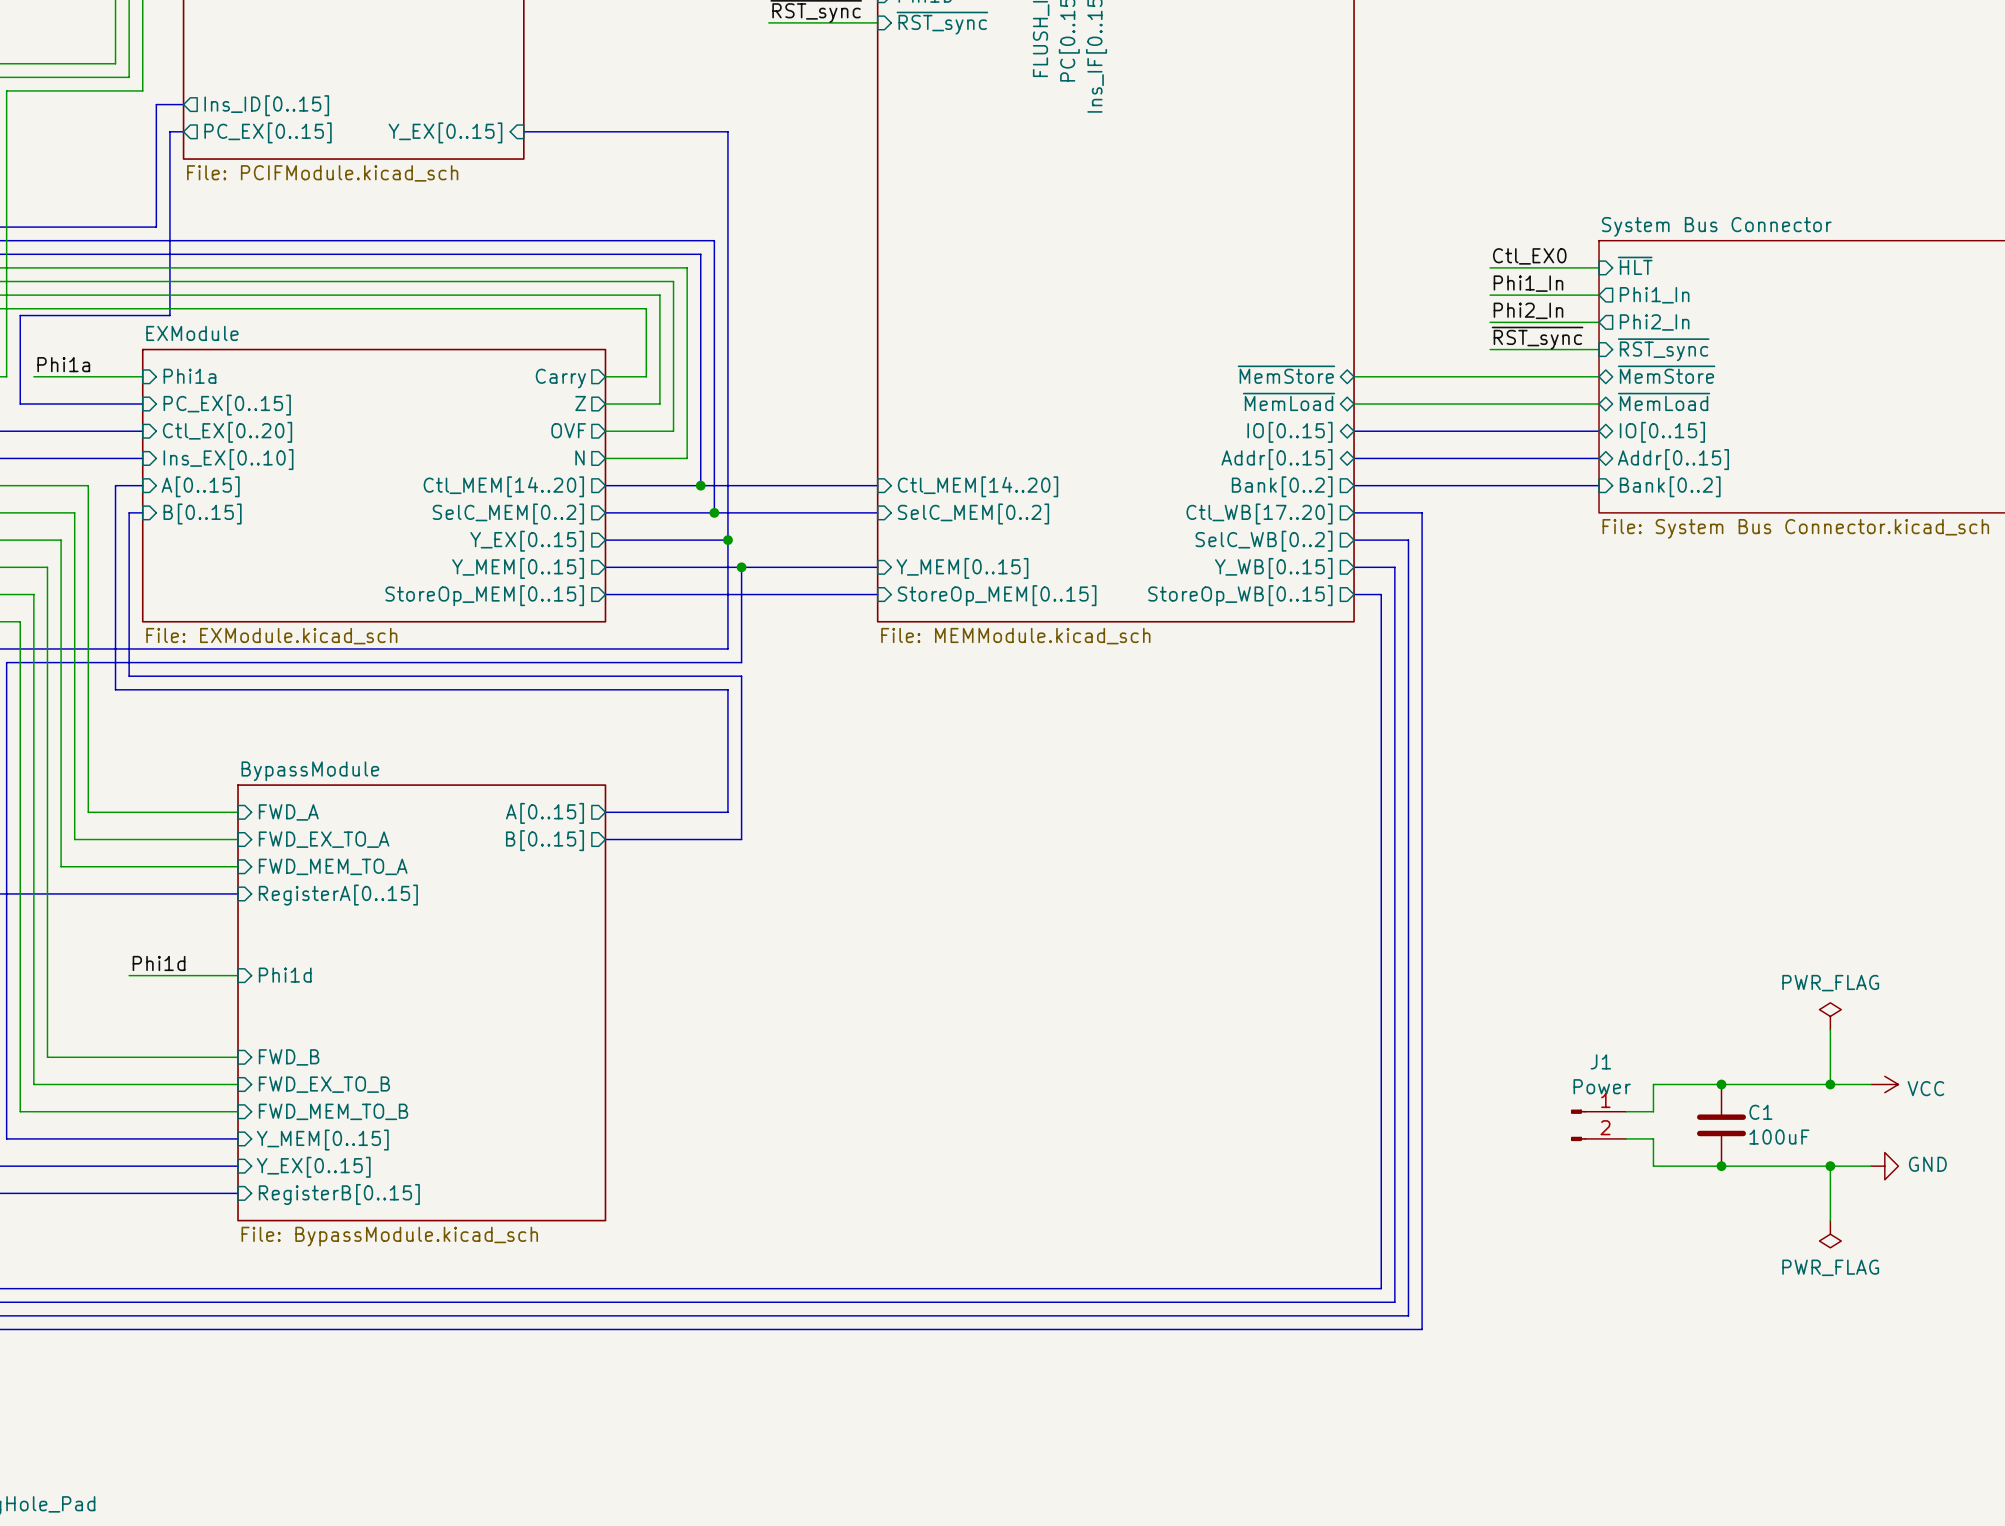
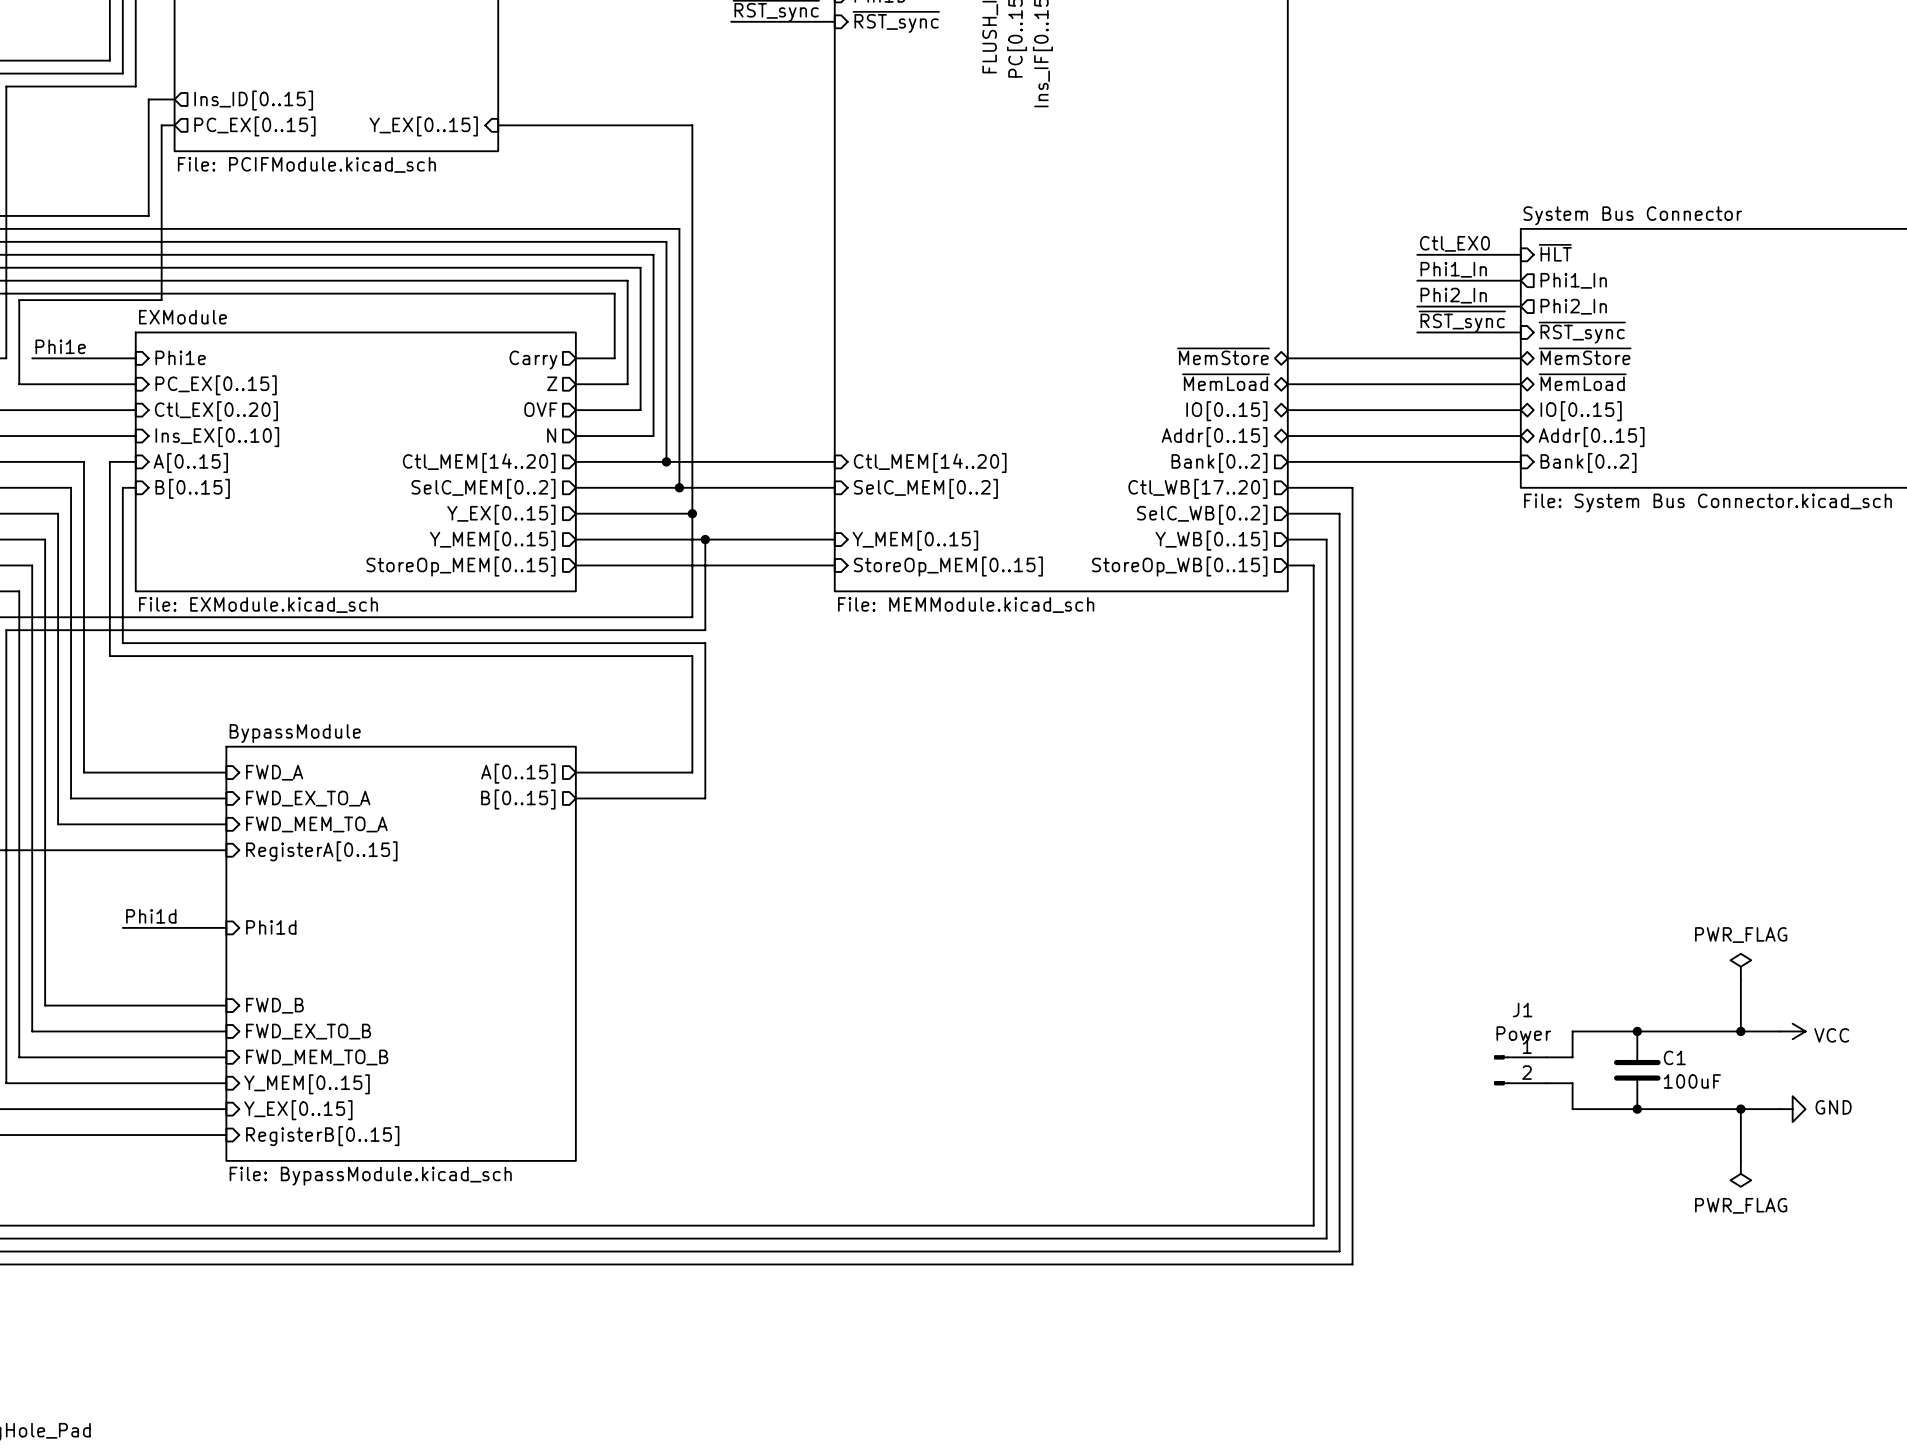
label: Phi1a (63, 364) -> Phi1e (60, 346)
sheet pin: Phi1a (189, 376) -> Phi1e (180, 357)

